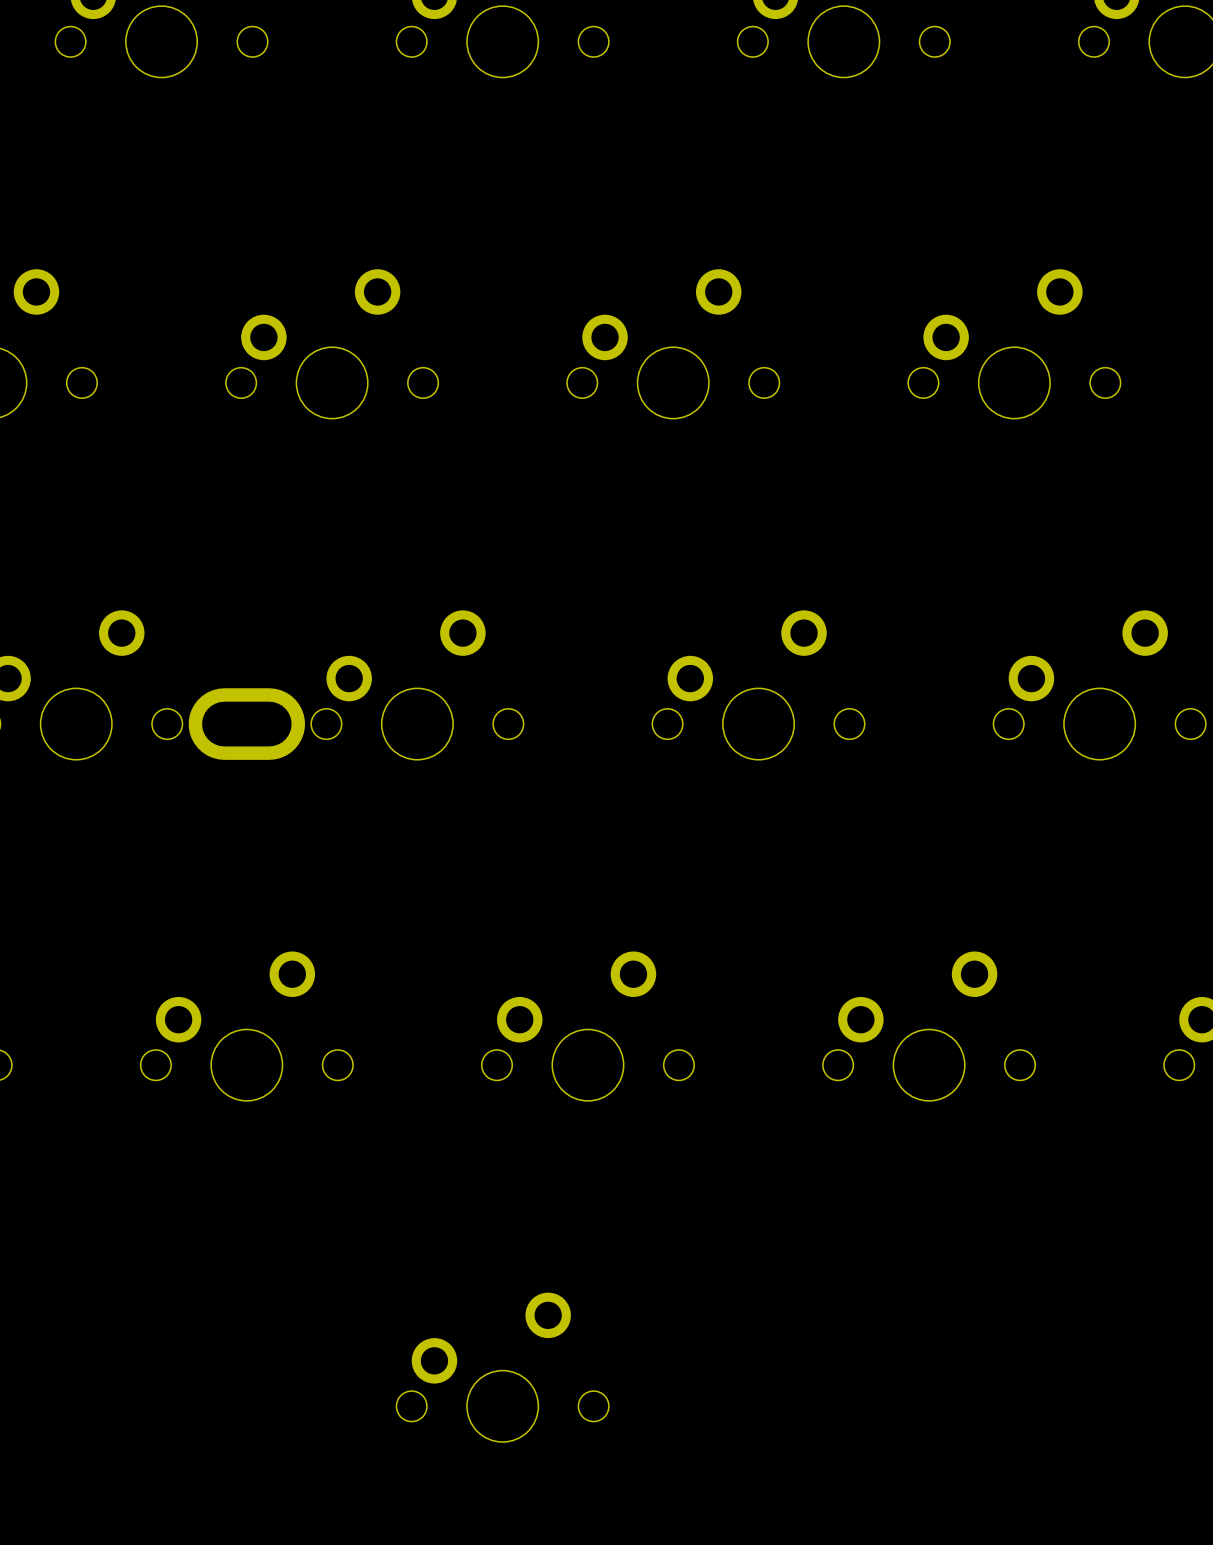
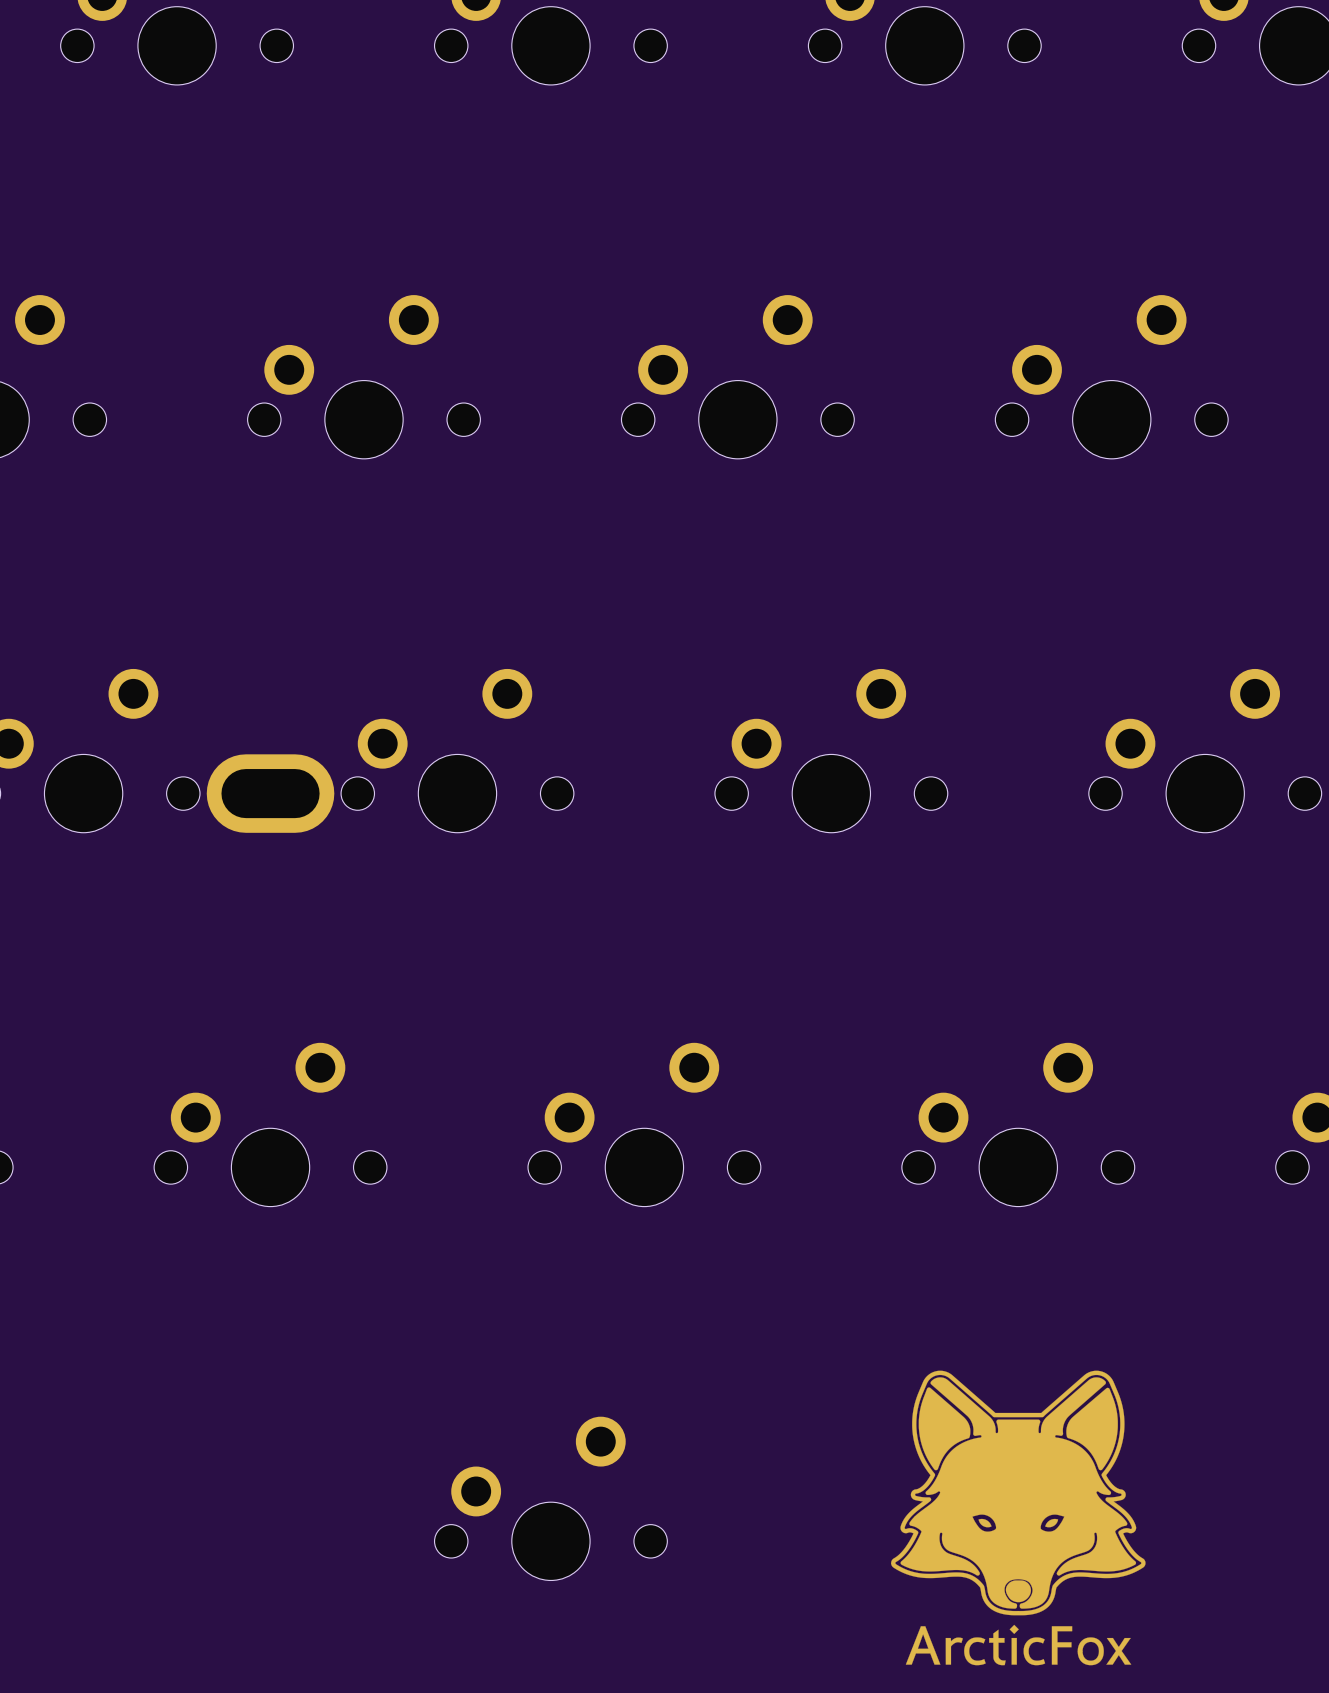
part: none -> (1018, 1517)

